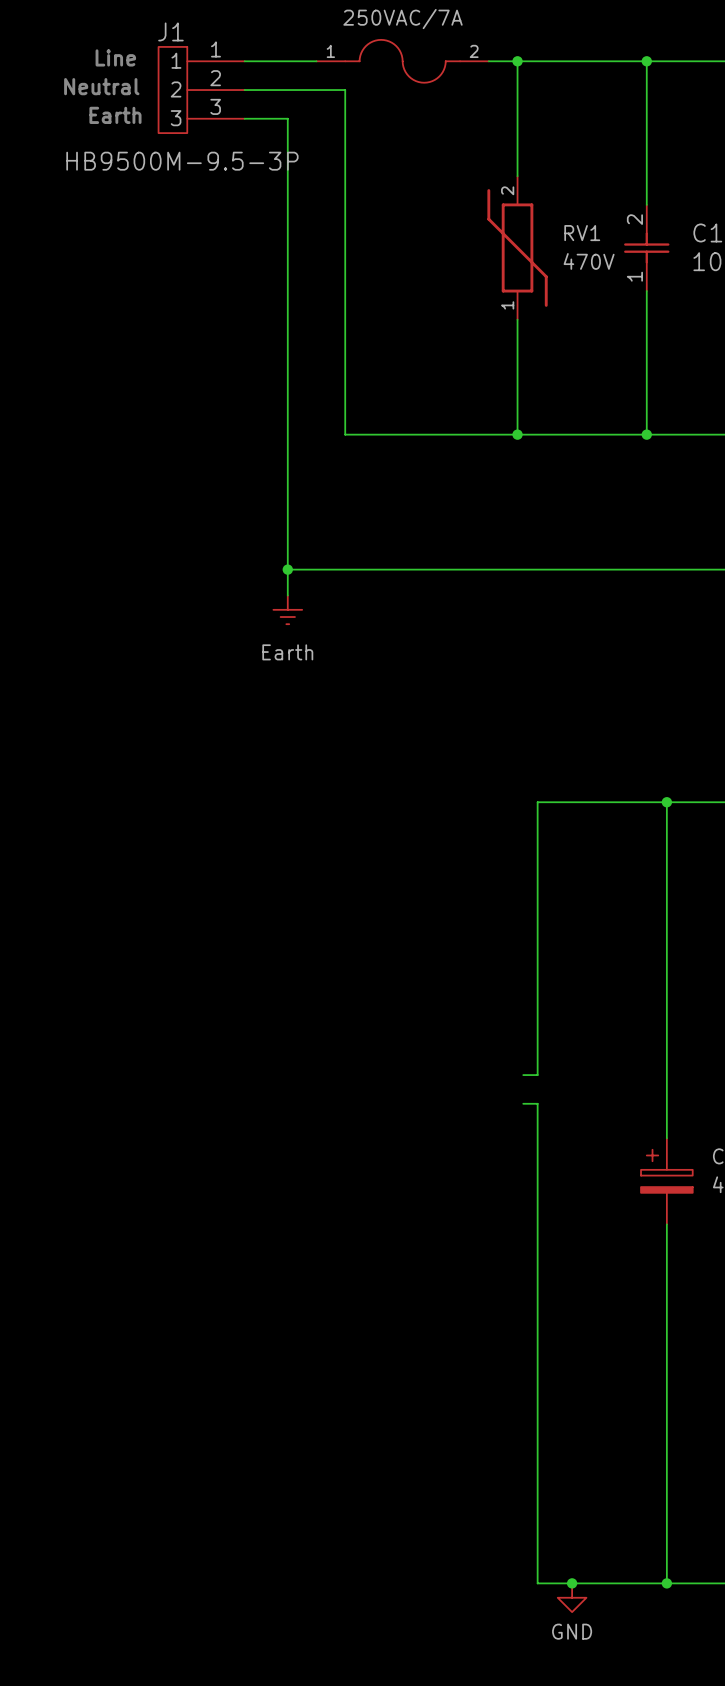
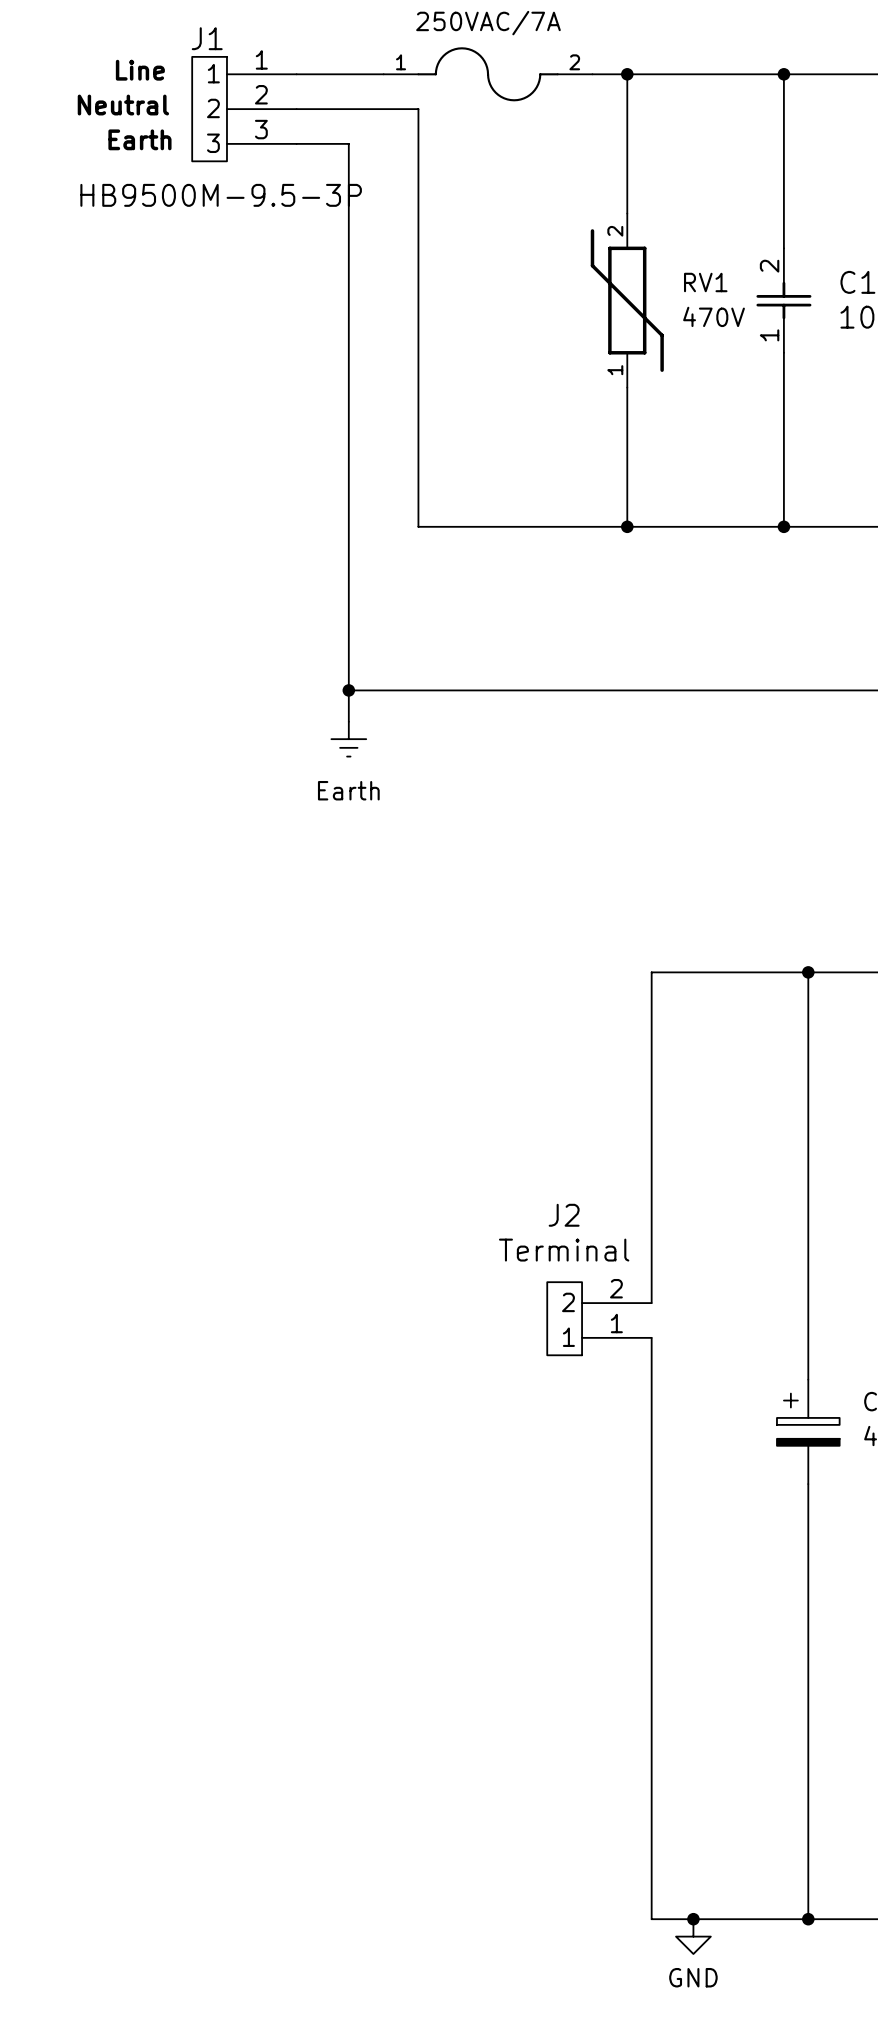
J2: none -> Terminal (599, 1318)

